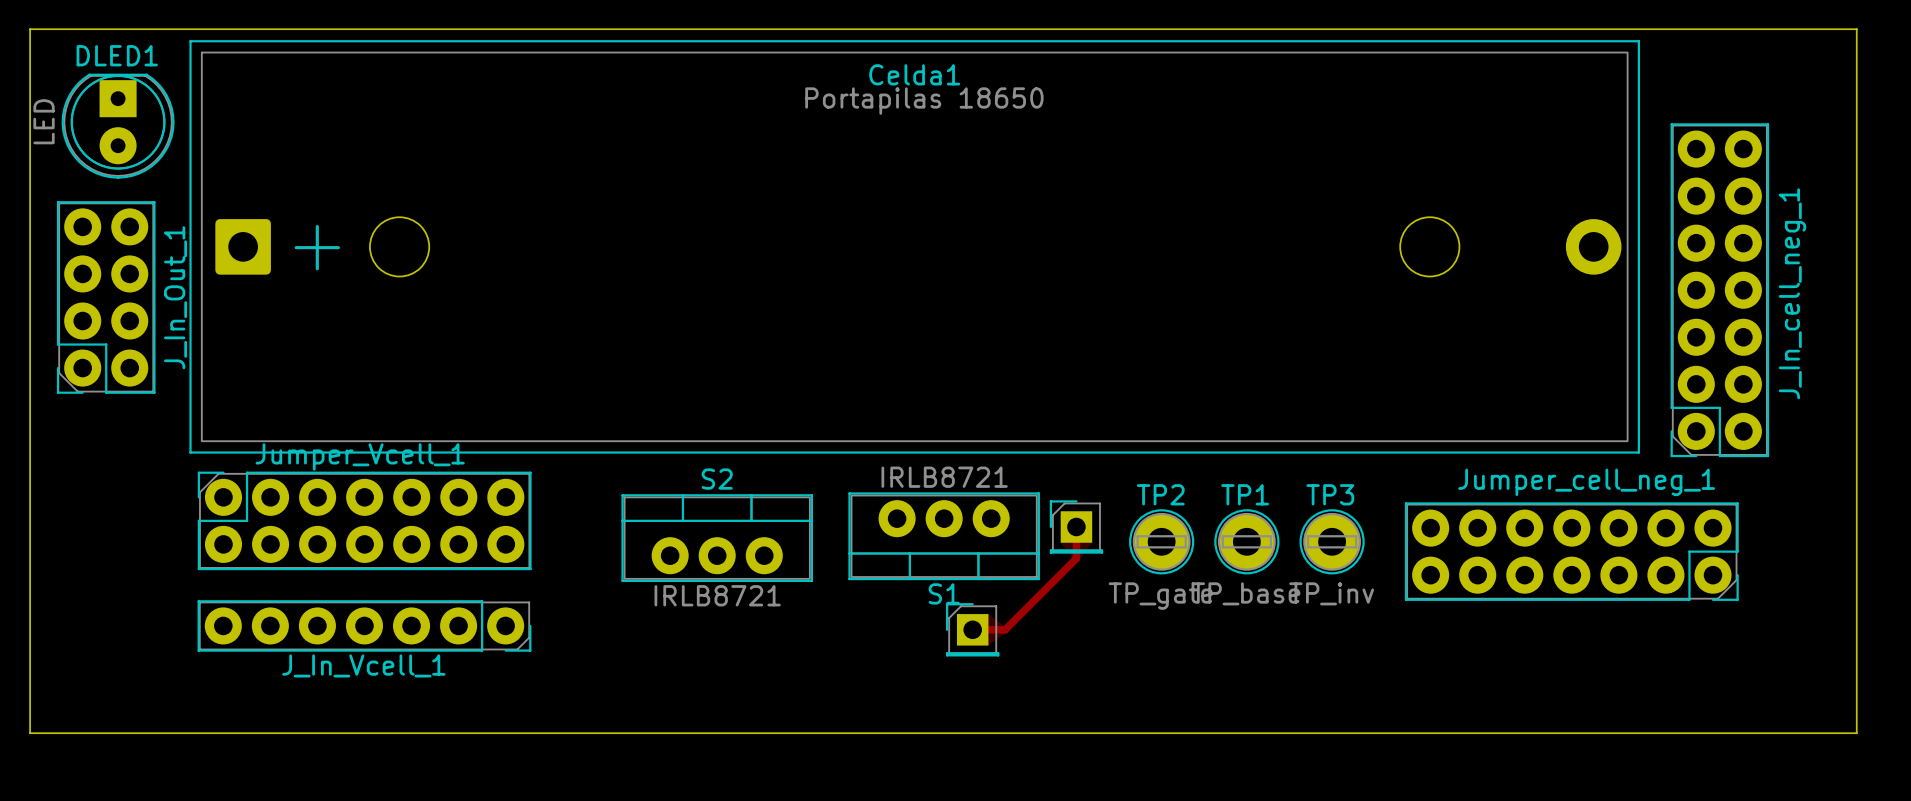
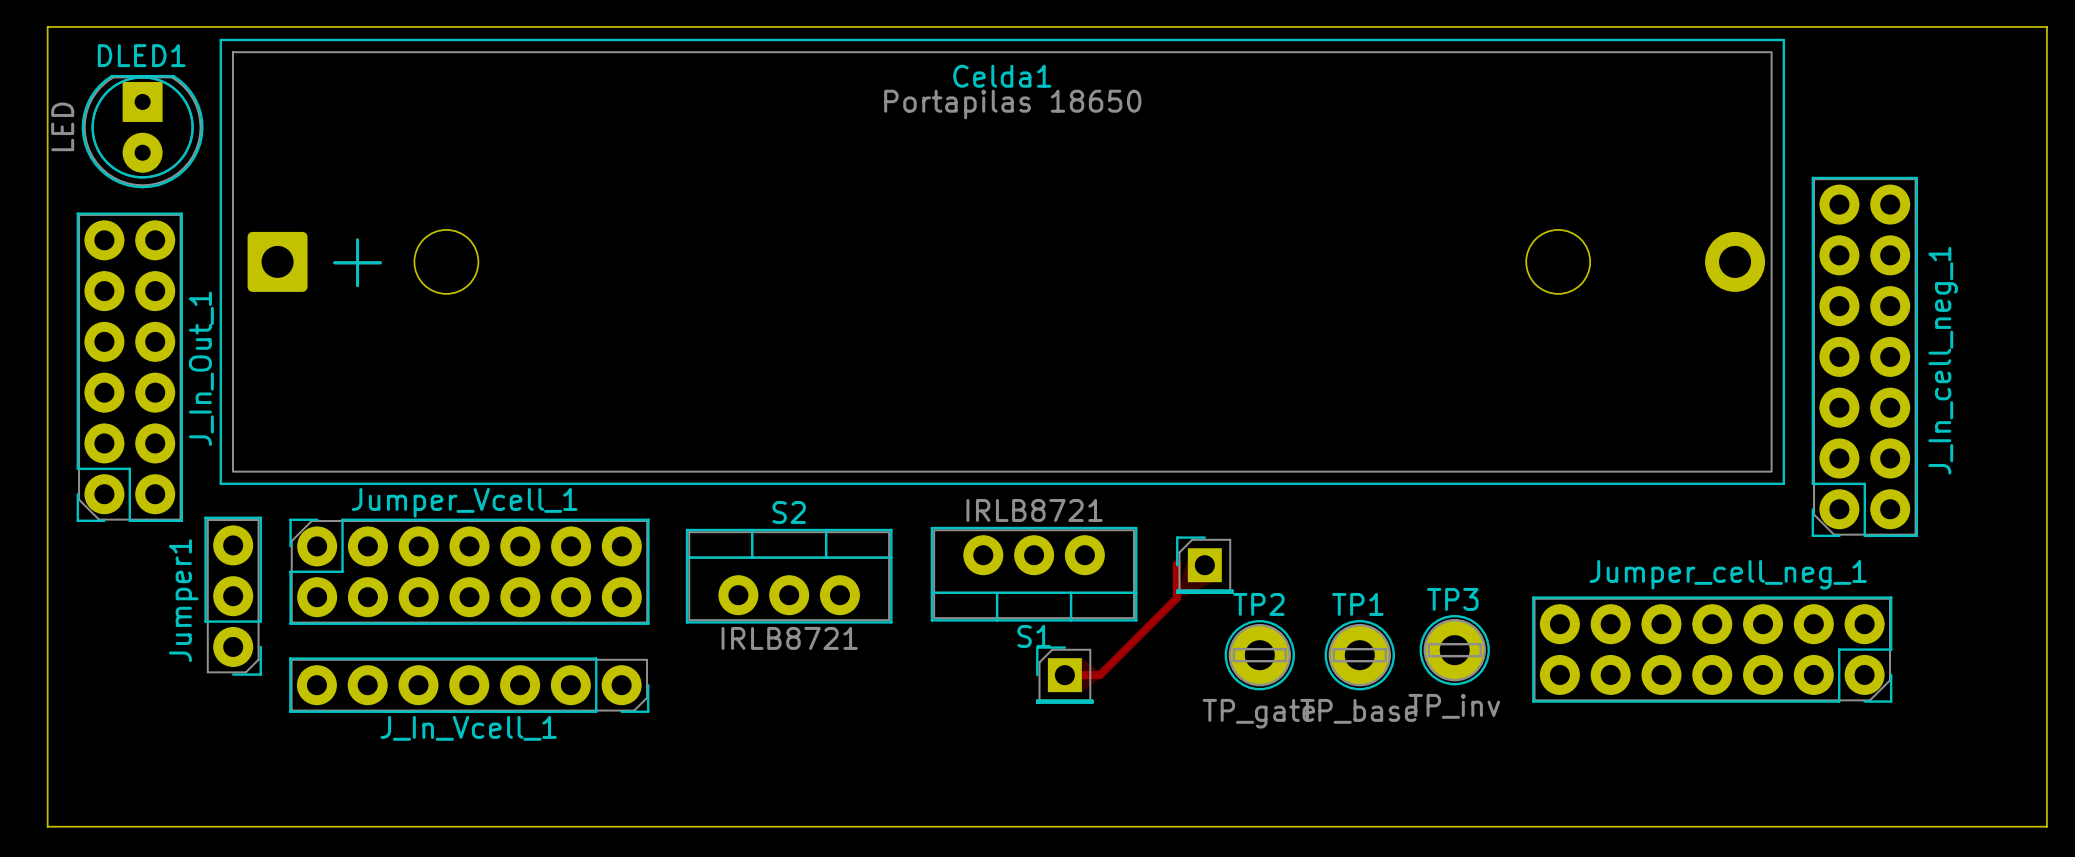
board edge: (1856, 29) (1856, 733) (30, 733) -> (2018, 26) (2046, 26) (2046, 826) (47, 826) (47, 786)
J_In_Out_1 footprint: [56, 201, 156, 394] -> [76, 212, 183, 523]
J_In_cell_neg_1 position: (1719, 290) -> (1864, 356)
Jumper_Vcell_1 position: (364, 520) -> (469, 571)
part position: (1076, 526) -> (1204, 565)
TP2 position: (1161, 541) -> (1259, 655)
TP1 position: (1246, 541) -> (1359, 655)
TP3 position: (1332, 541) -> (1454, 650)
Jumper_cell_neg_1 position: (1571, 551) -> (1712, 649)
Jumper1: none -> (233, 596)
J_In_Vcell_1 position: (364, 625) -> (469, 685)

